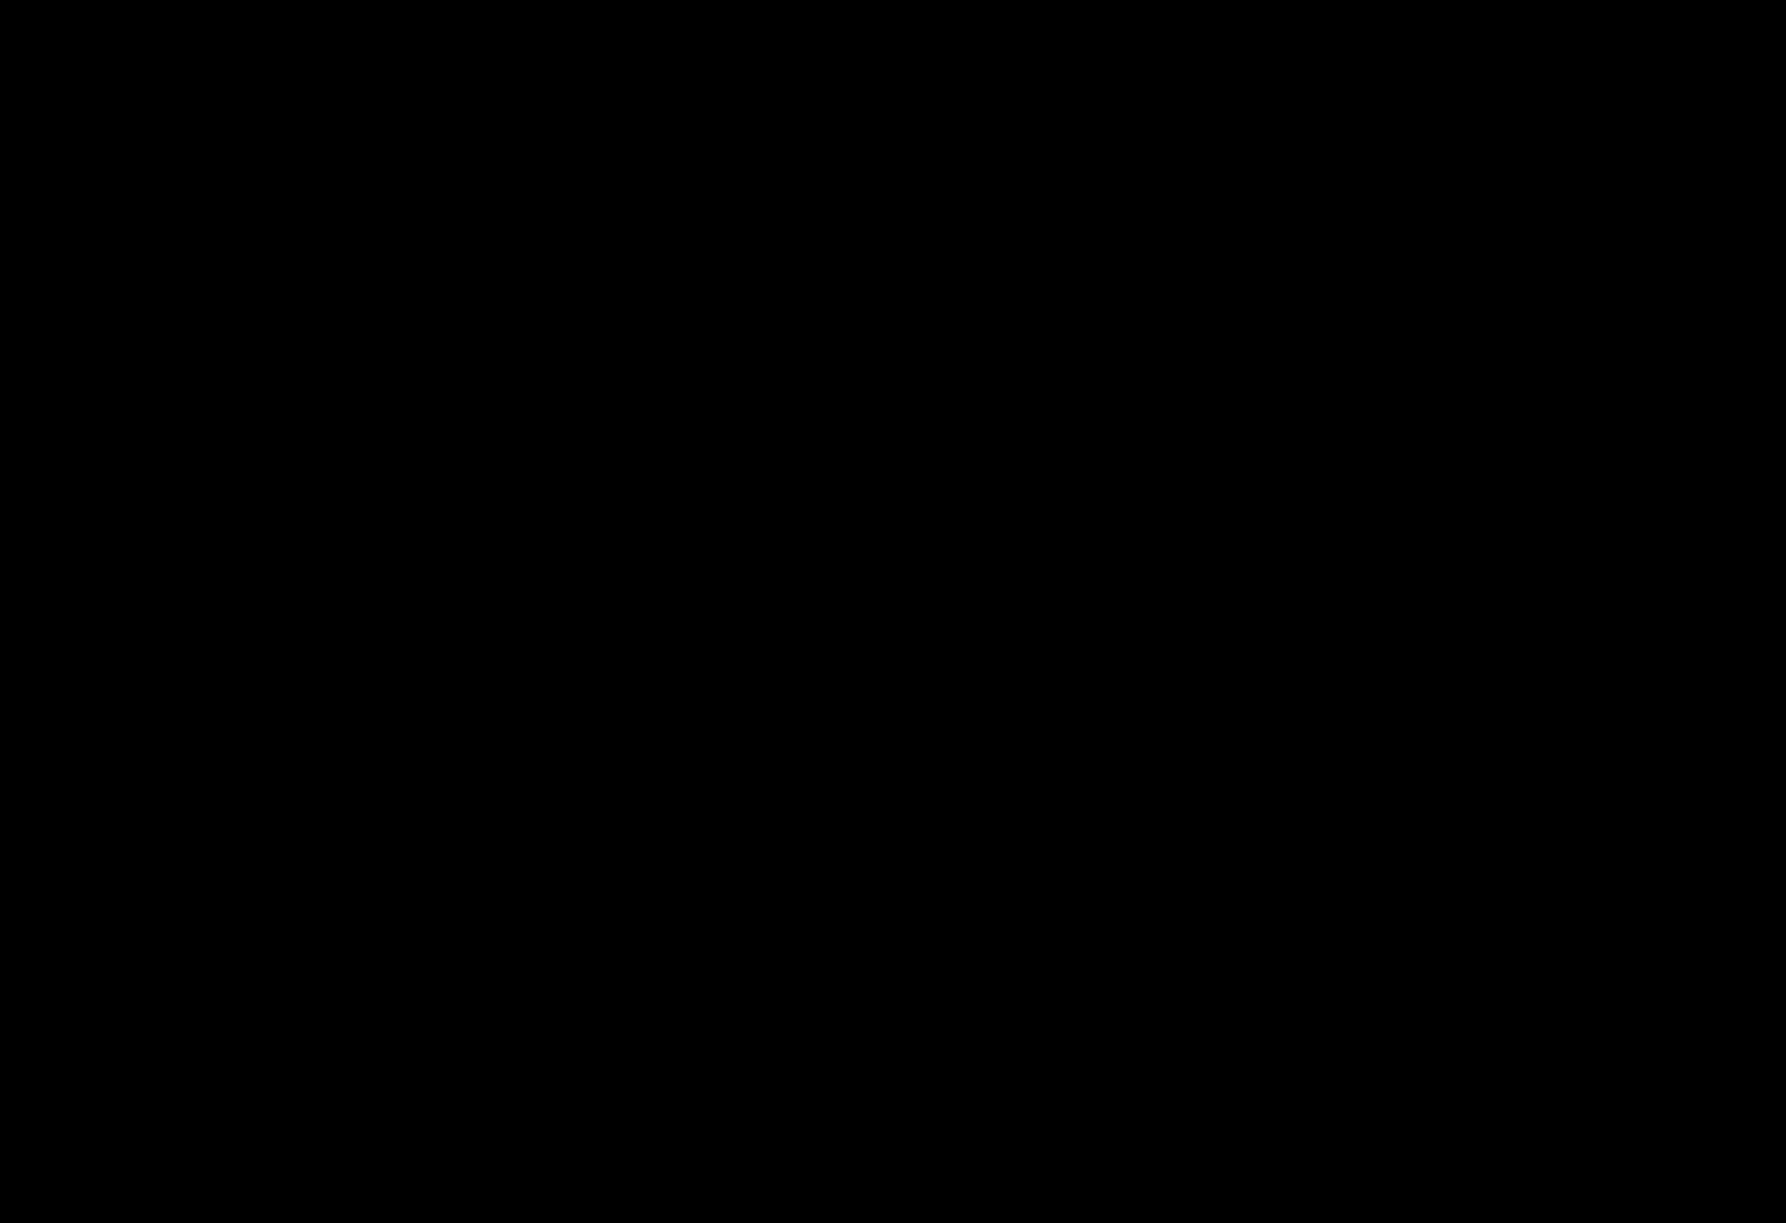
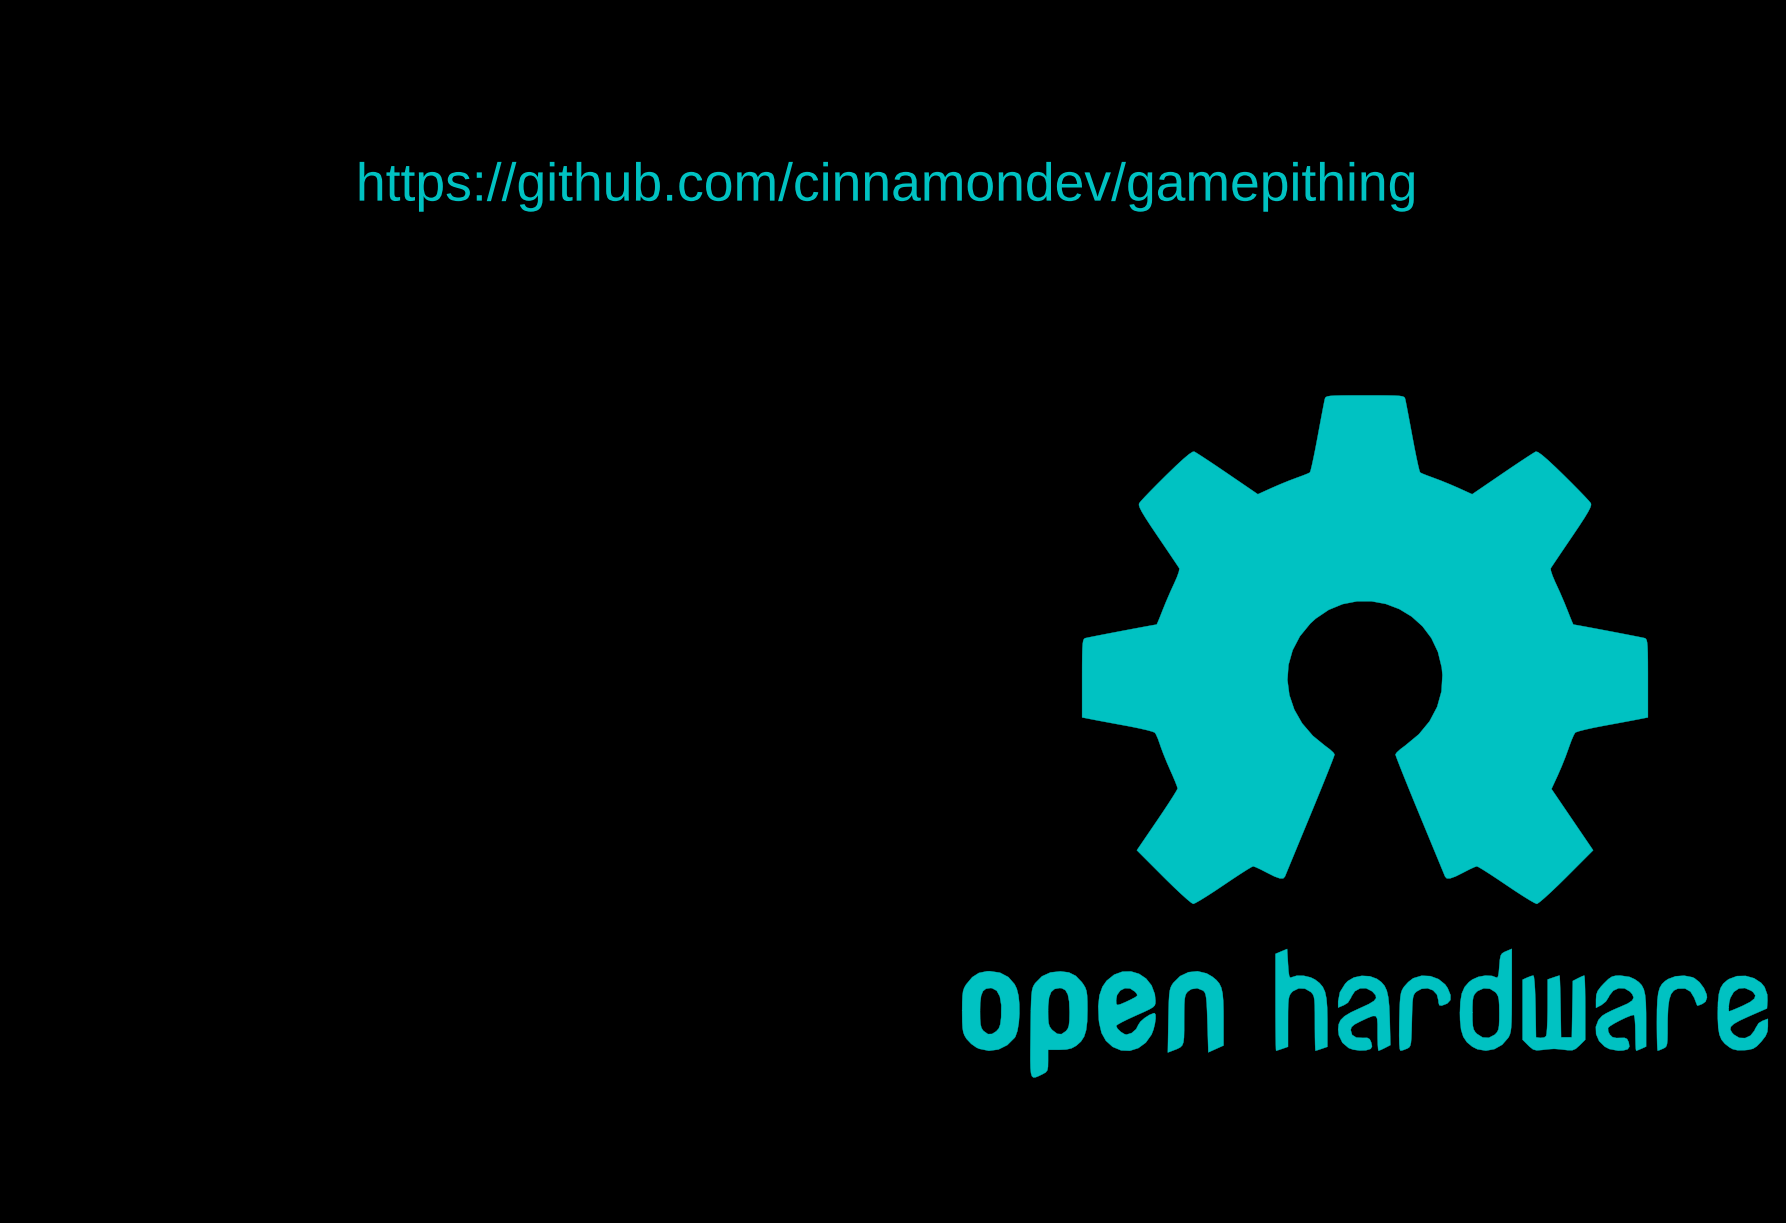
text: none -> https://github.com/cinnamondev/gamepithing (886, 186)
drawing: none -> [961, 395, 1769, 1078]

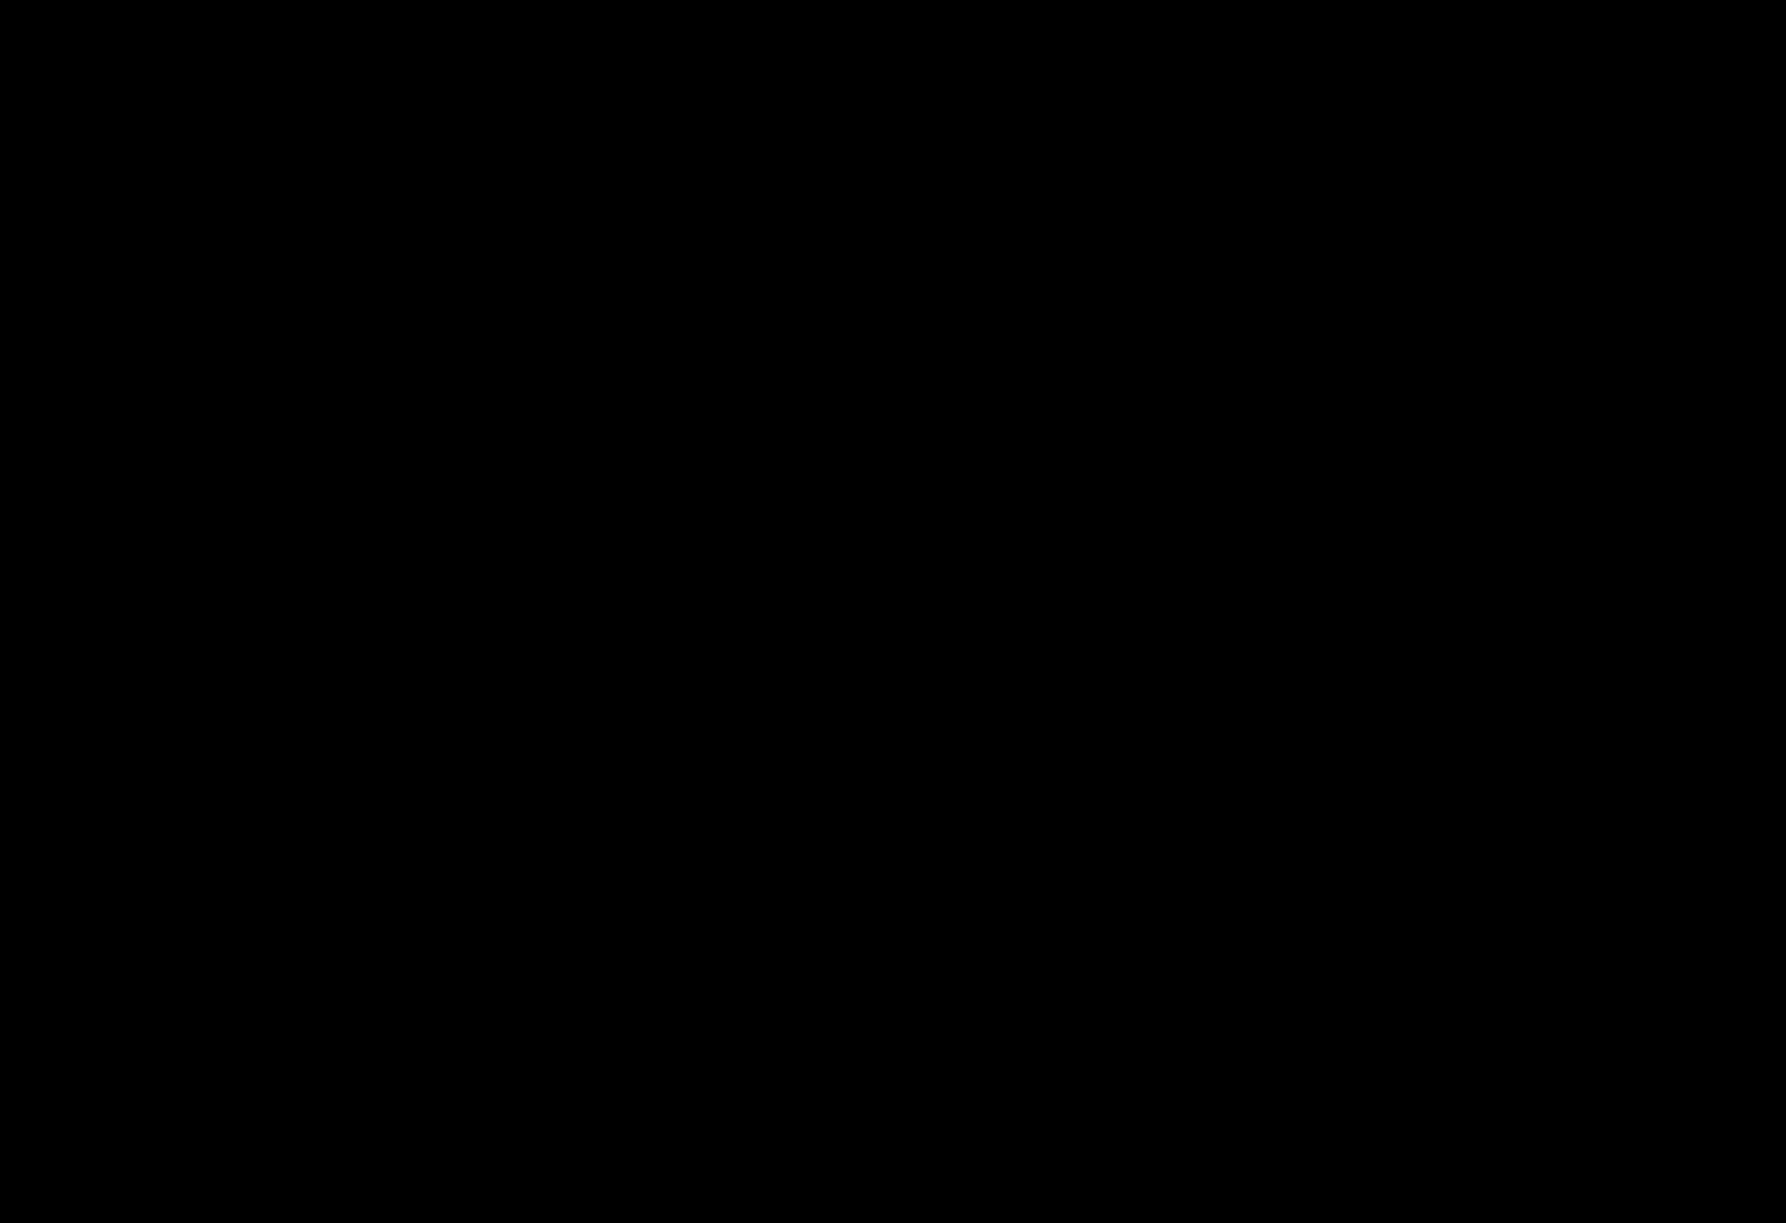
text: https://github.com/cinnamondev/gamepithing (886, 186) -> none
drawing: [961, 395, 1769, 1078] -> none

